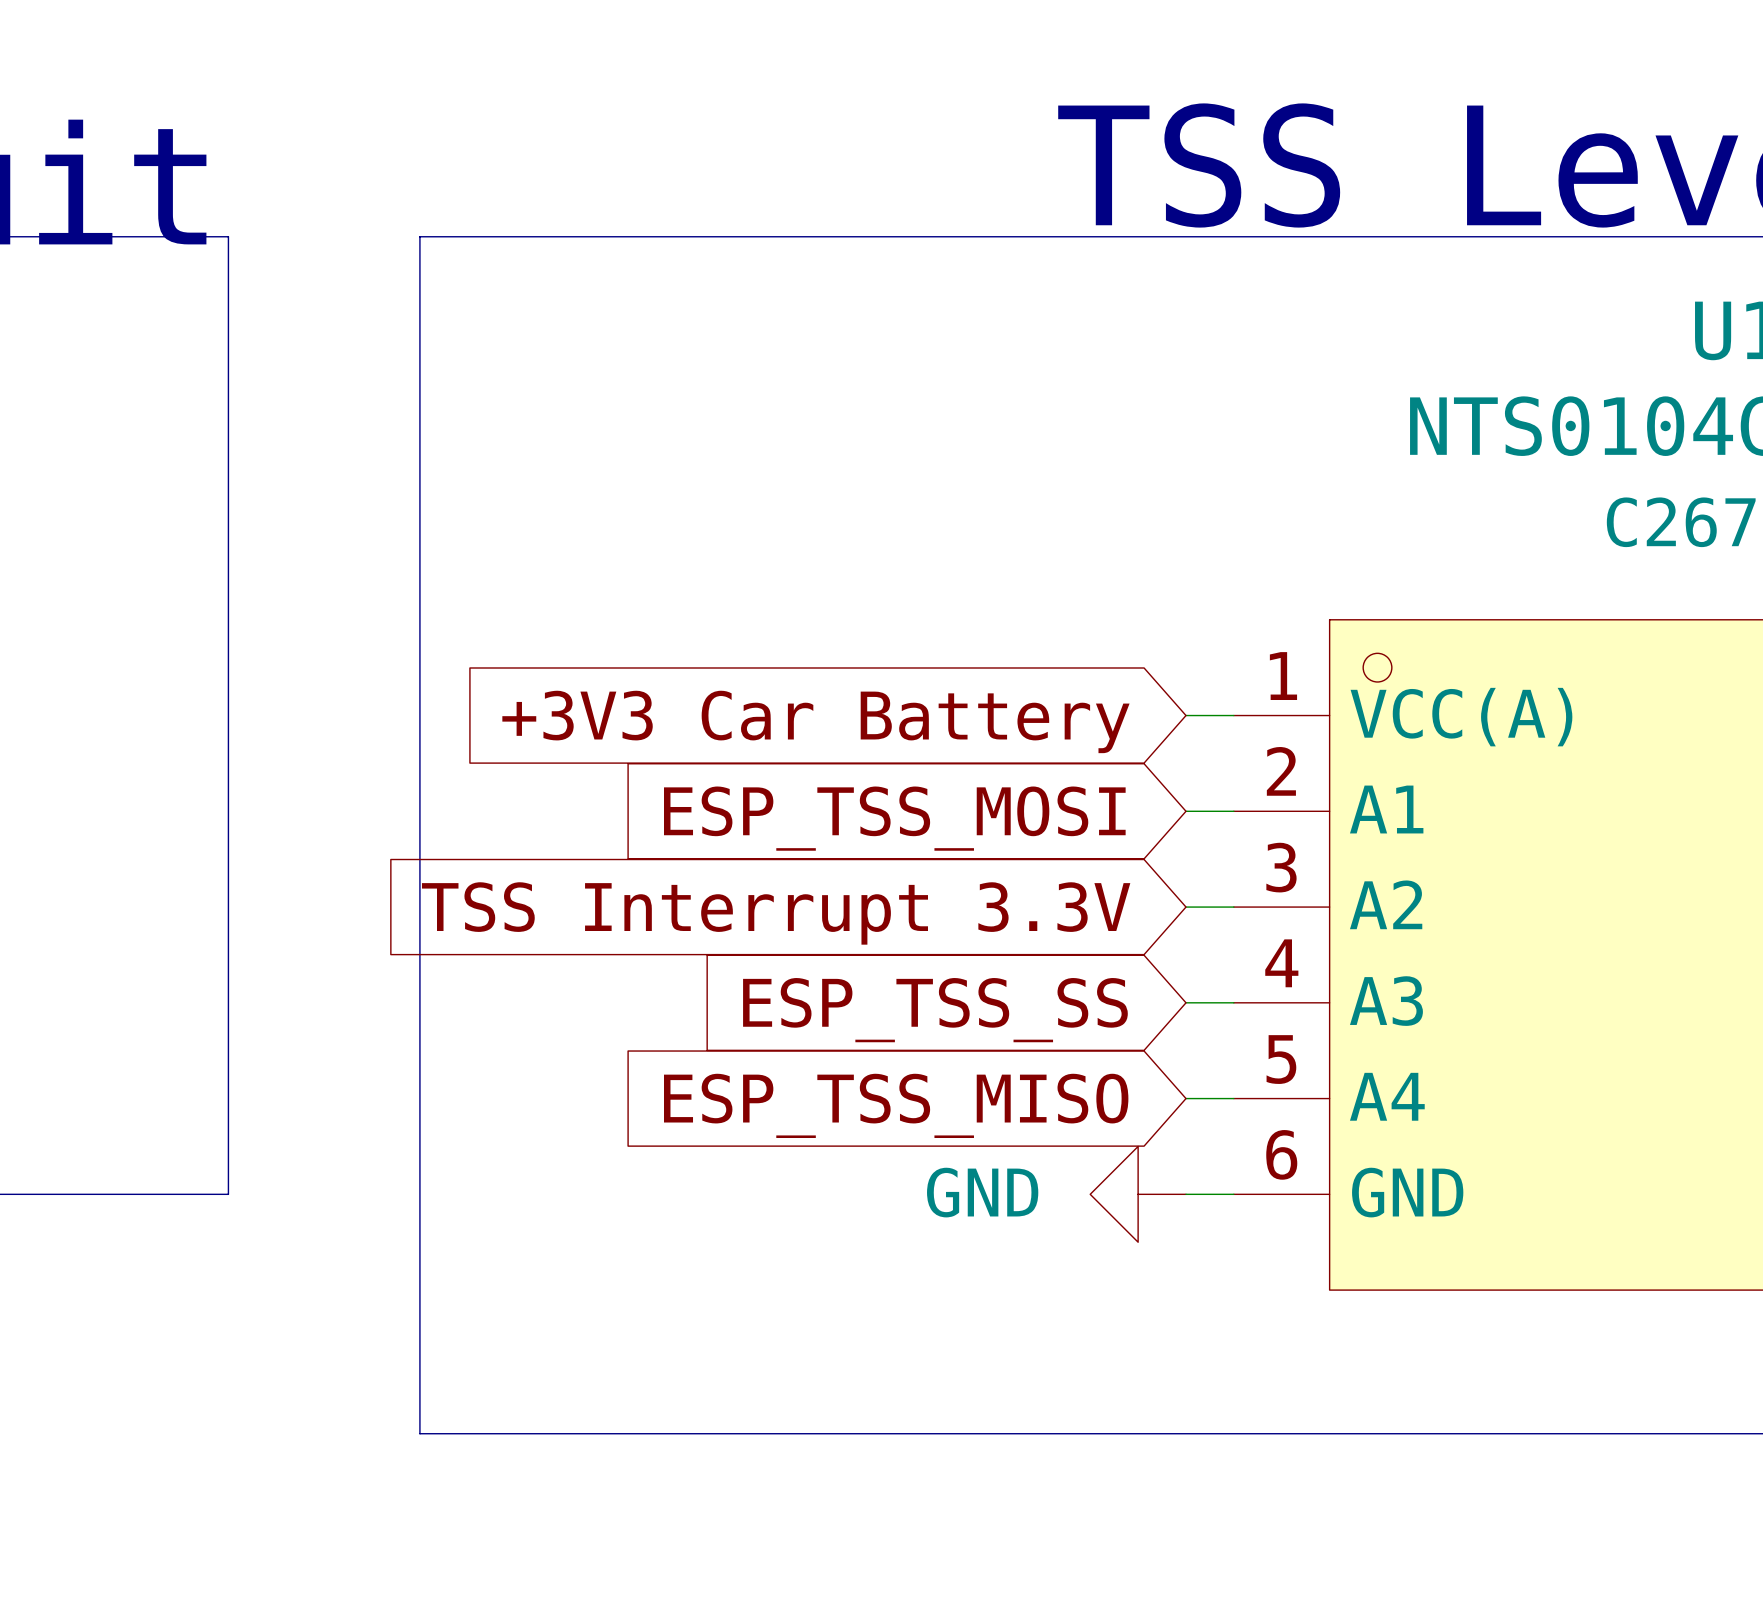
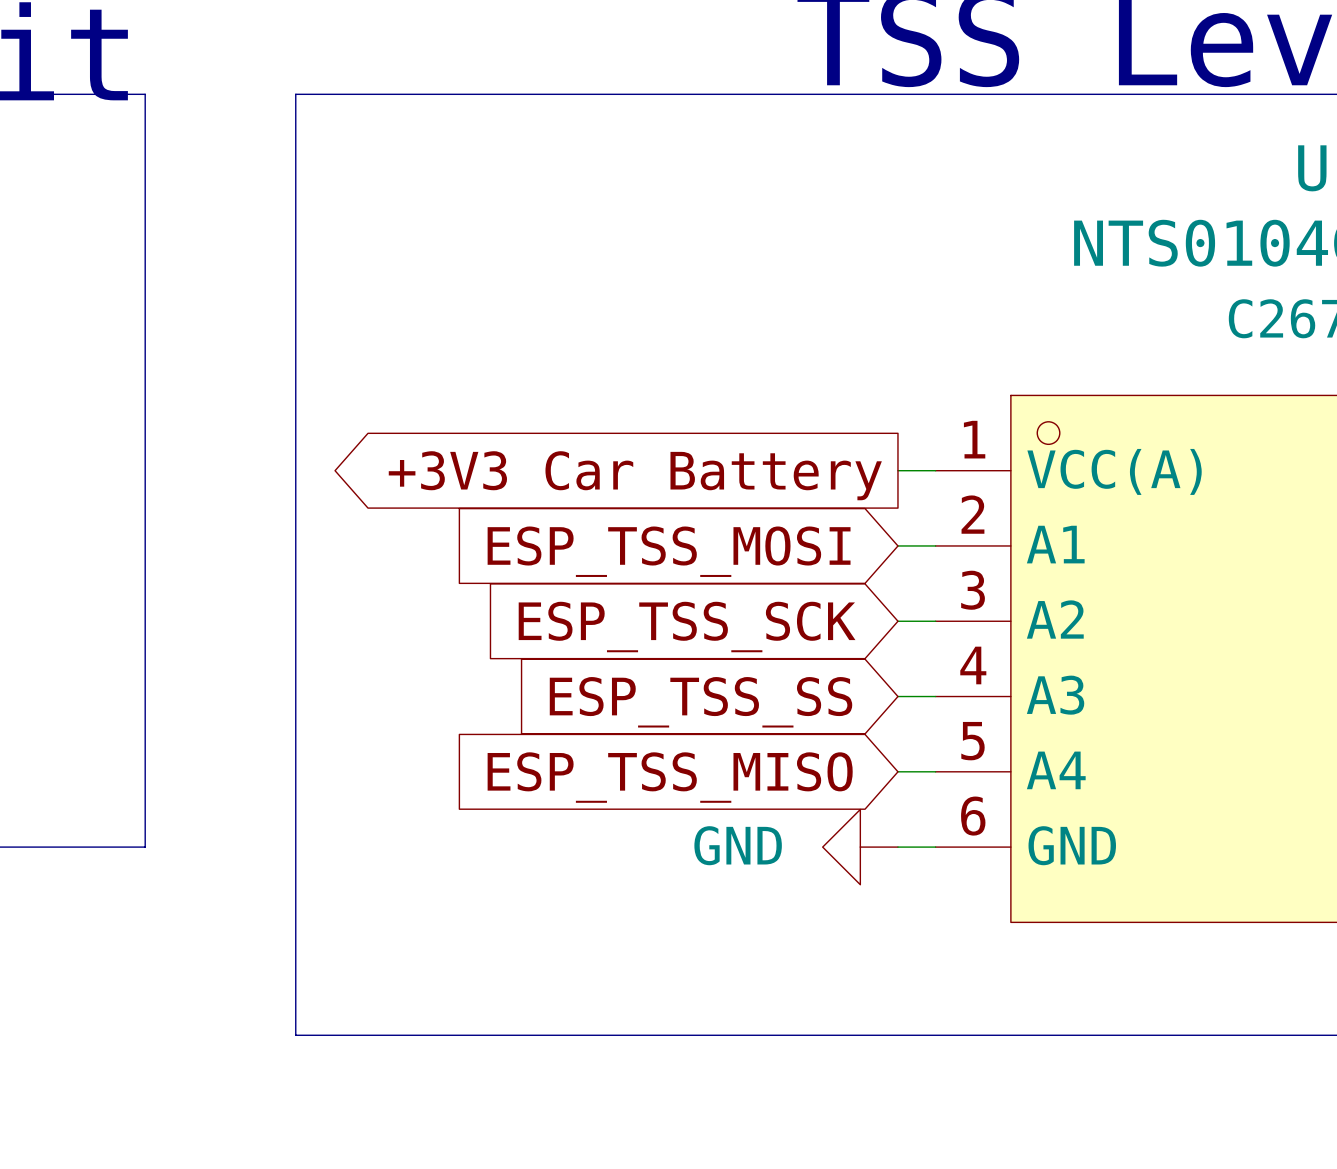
global label shape: input (815, 721) -> output (635, 475)
global label: TSS Interrupt 3.3V (776, 913) -> ESP_TSS_SCK (687, 627)

